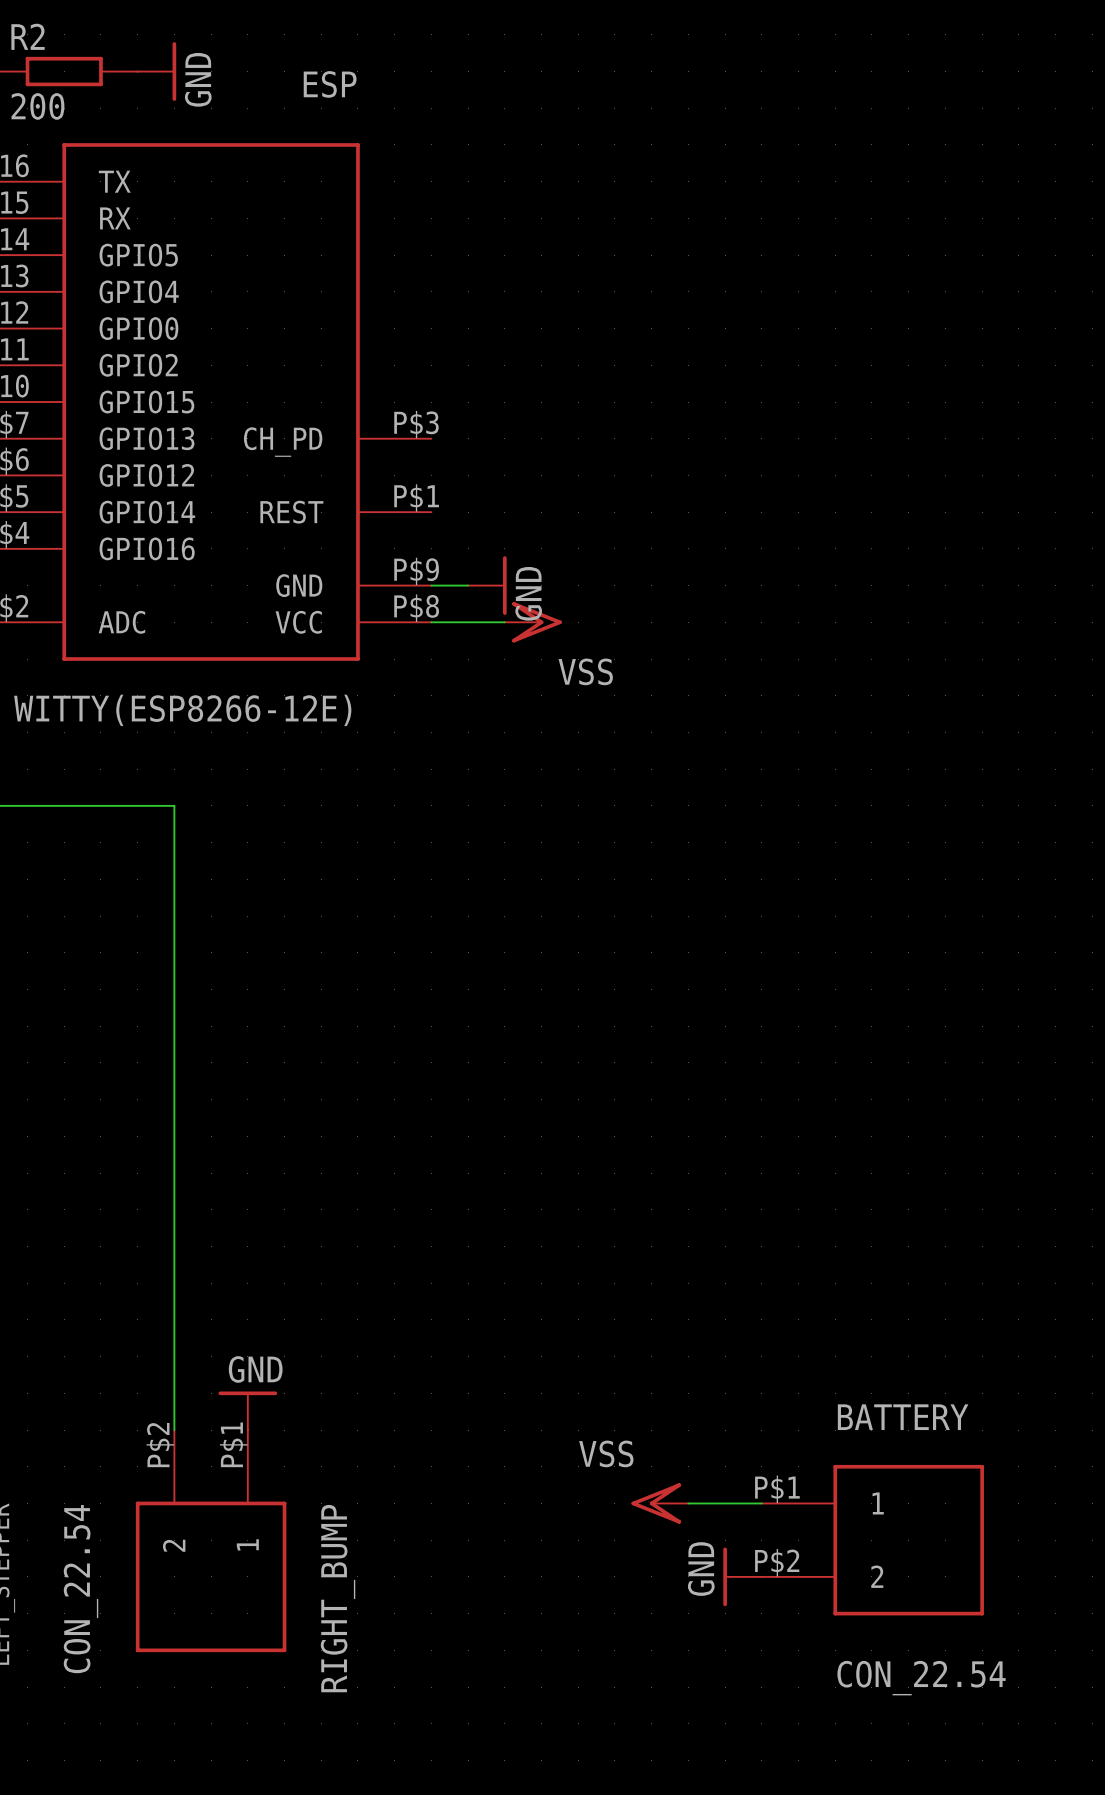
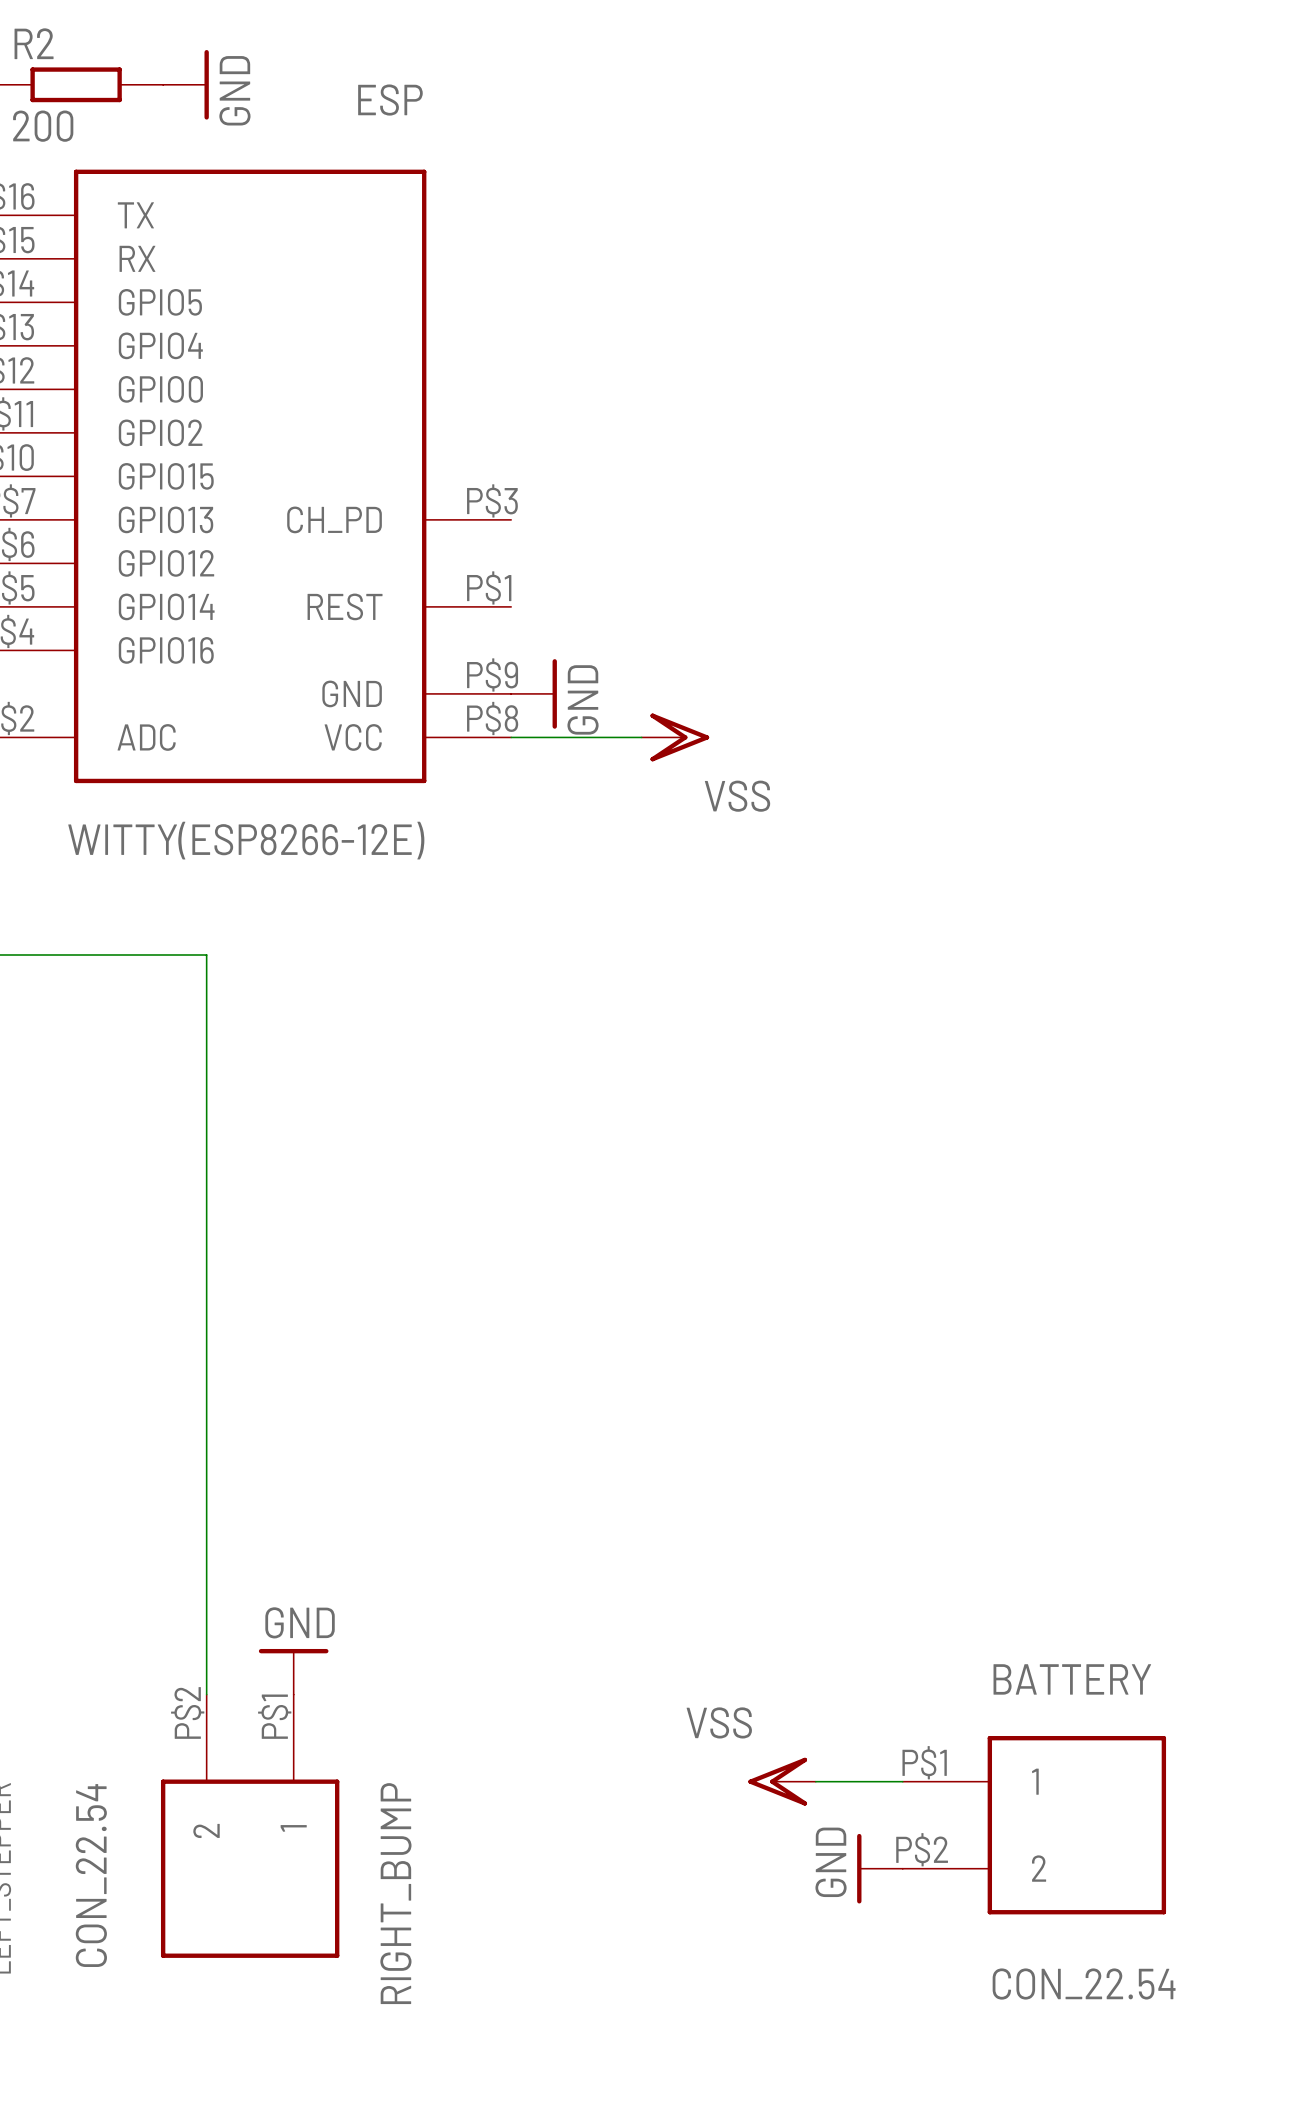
power symbol position: GND (487, 585) -> GND (534, 693)
power symbol position: VSS (533, 622) -> VSS (675, 737)

